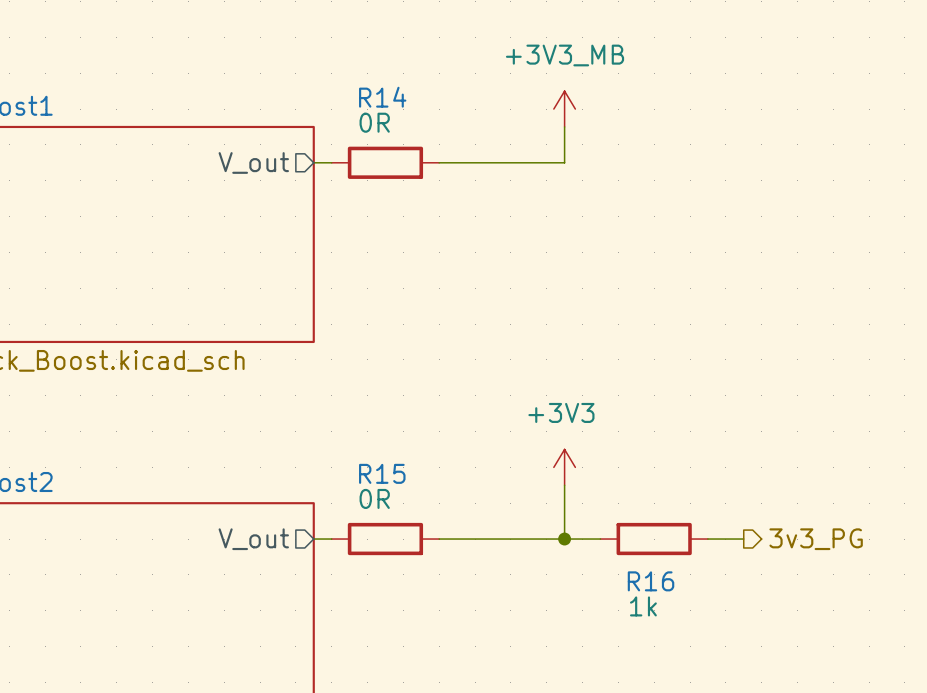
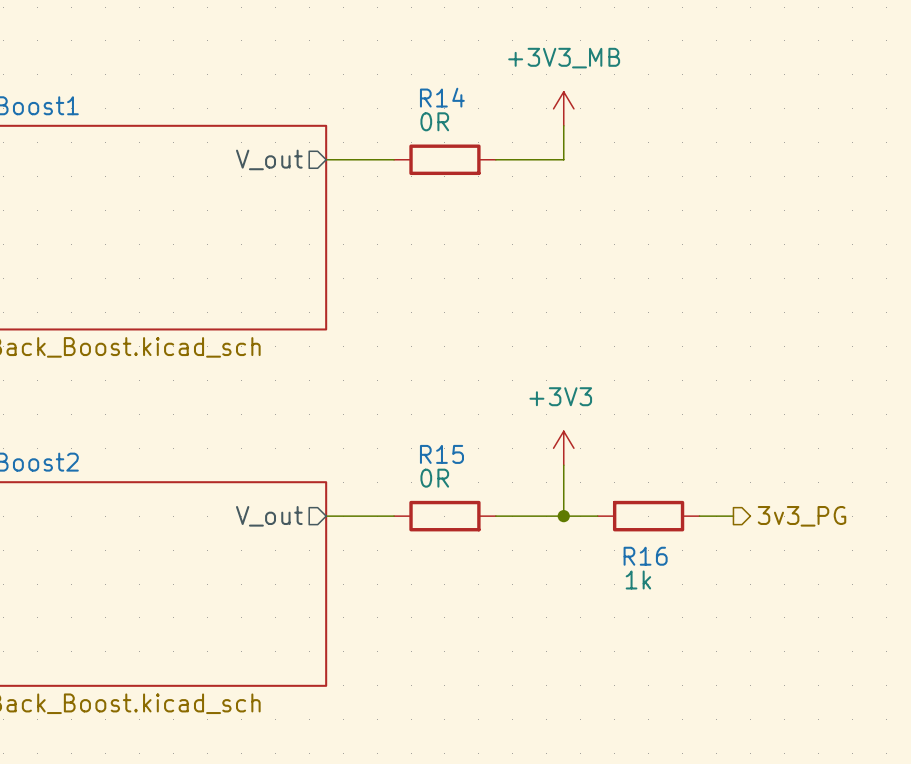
R14 position: (385, 162) -> (444, 159)
wire: (439, 162) (492, 162) -> (343, 159) (394, 159)
R15 position: (385, 539) -> (444, 516)
wire: (439, 539) (492, 539) -> (343, 516) (394, 516)

